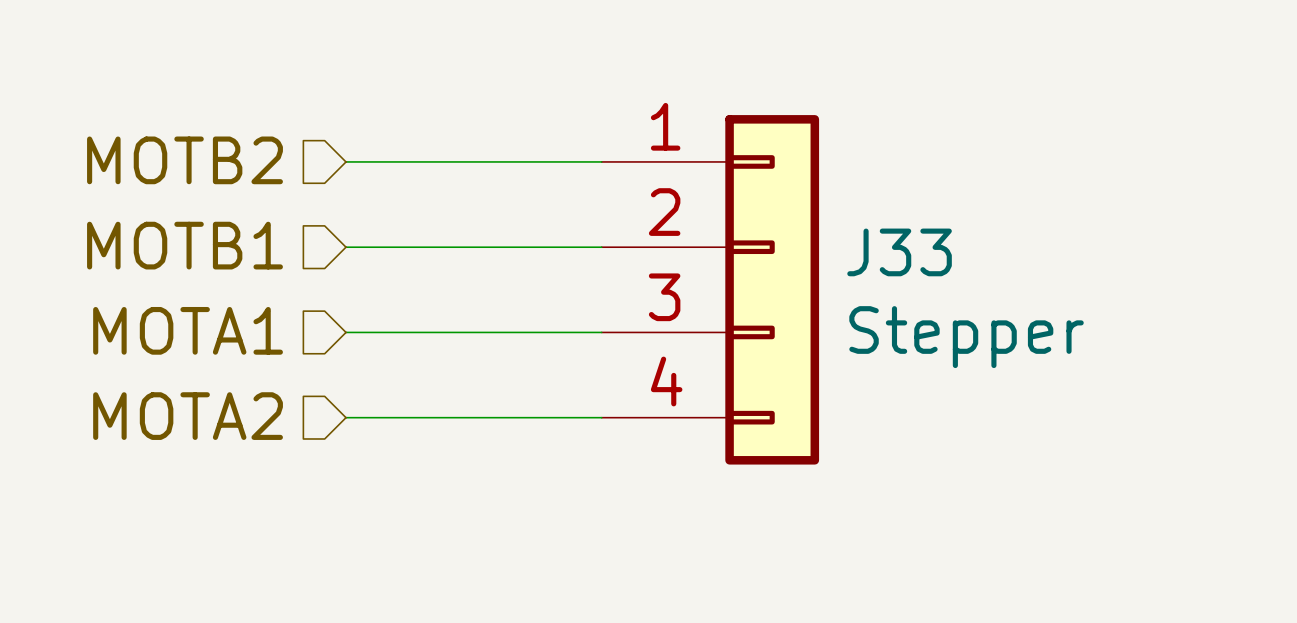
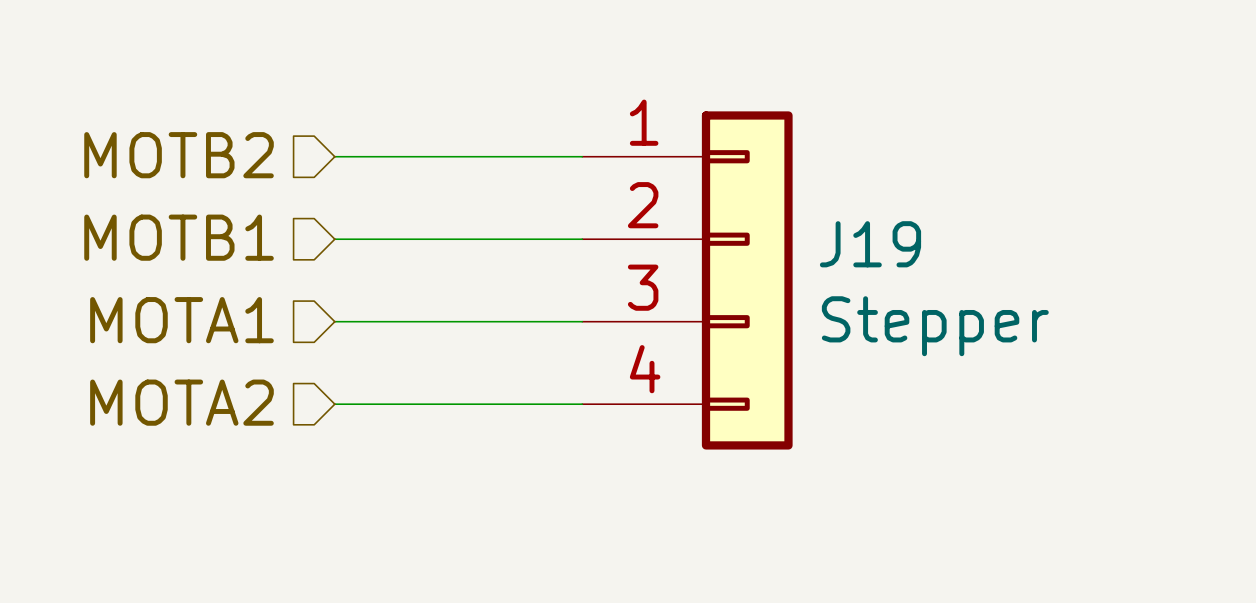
J33 name: J33 (899, 252) -> J19 (870, 244)

